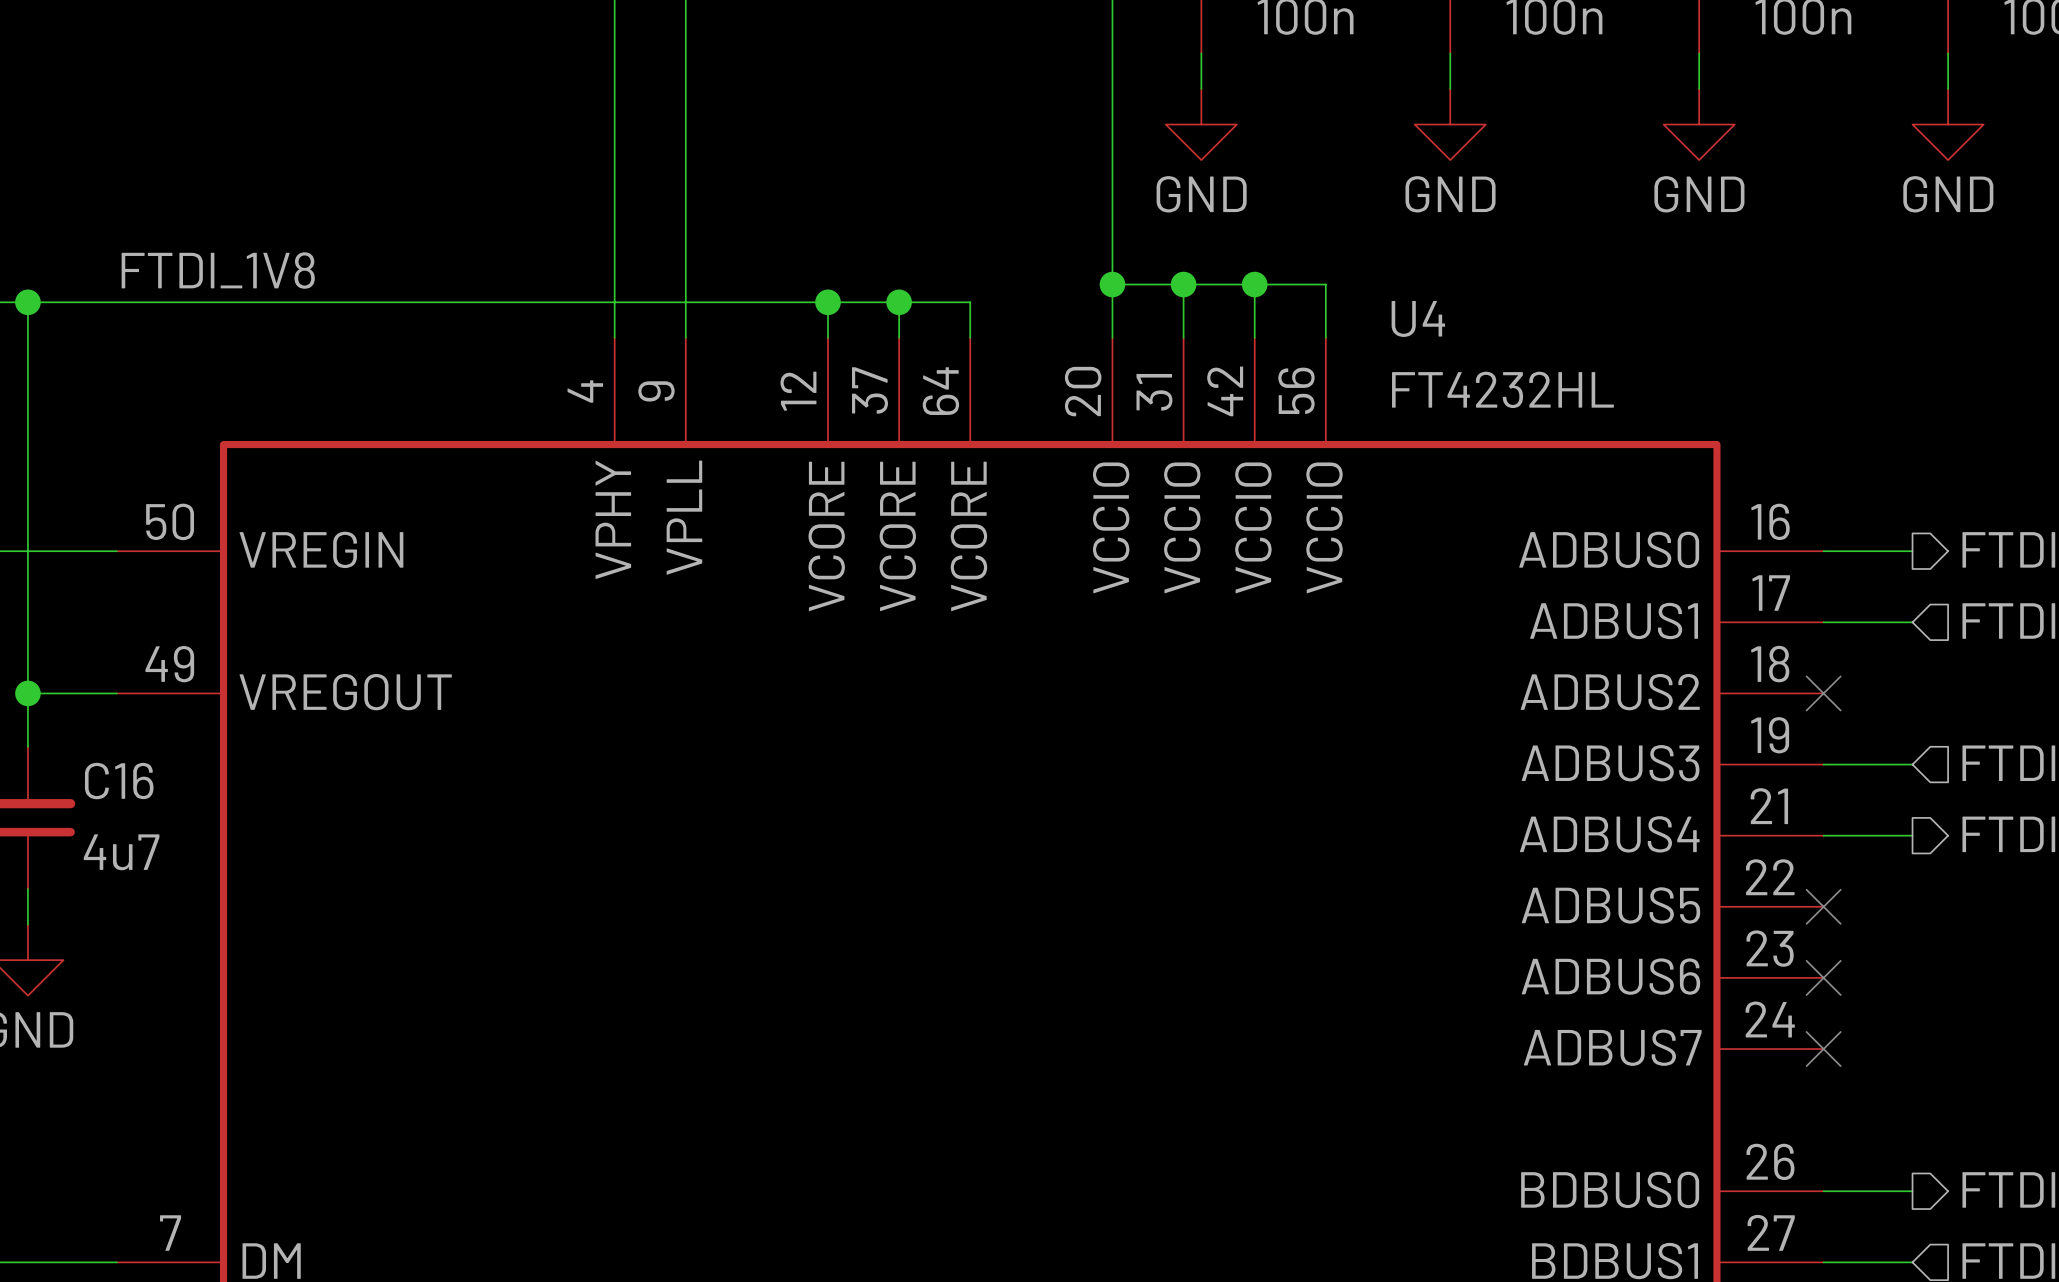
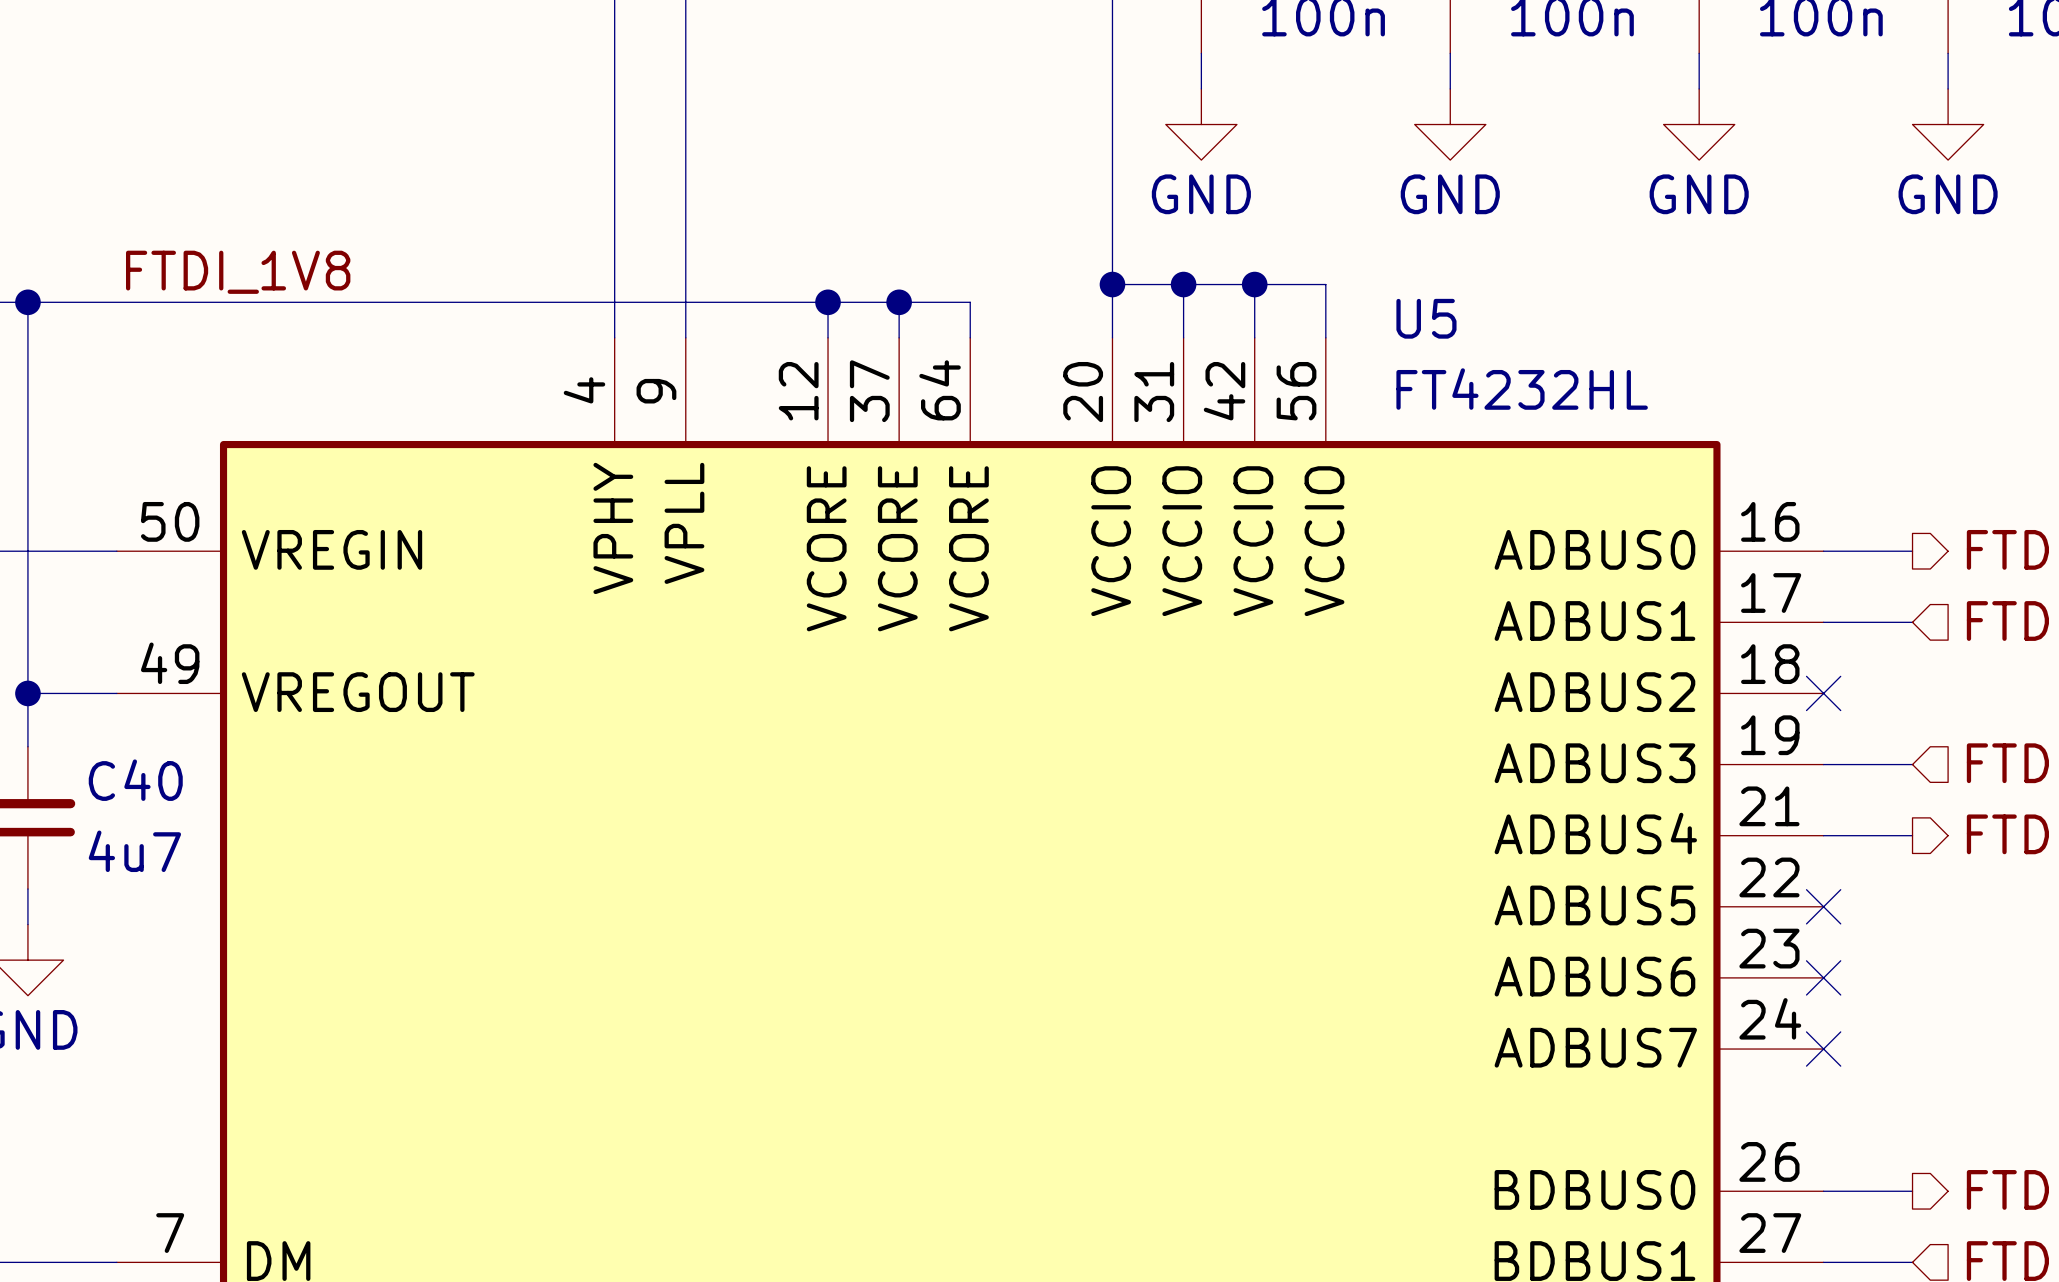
U4 name: U4 (1418, 318) -> U5 (1426, 318)
C16 name: C16 (119, 781) -> C40 (135, 780)

